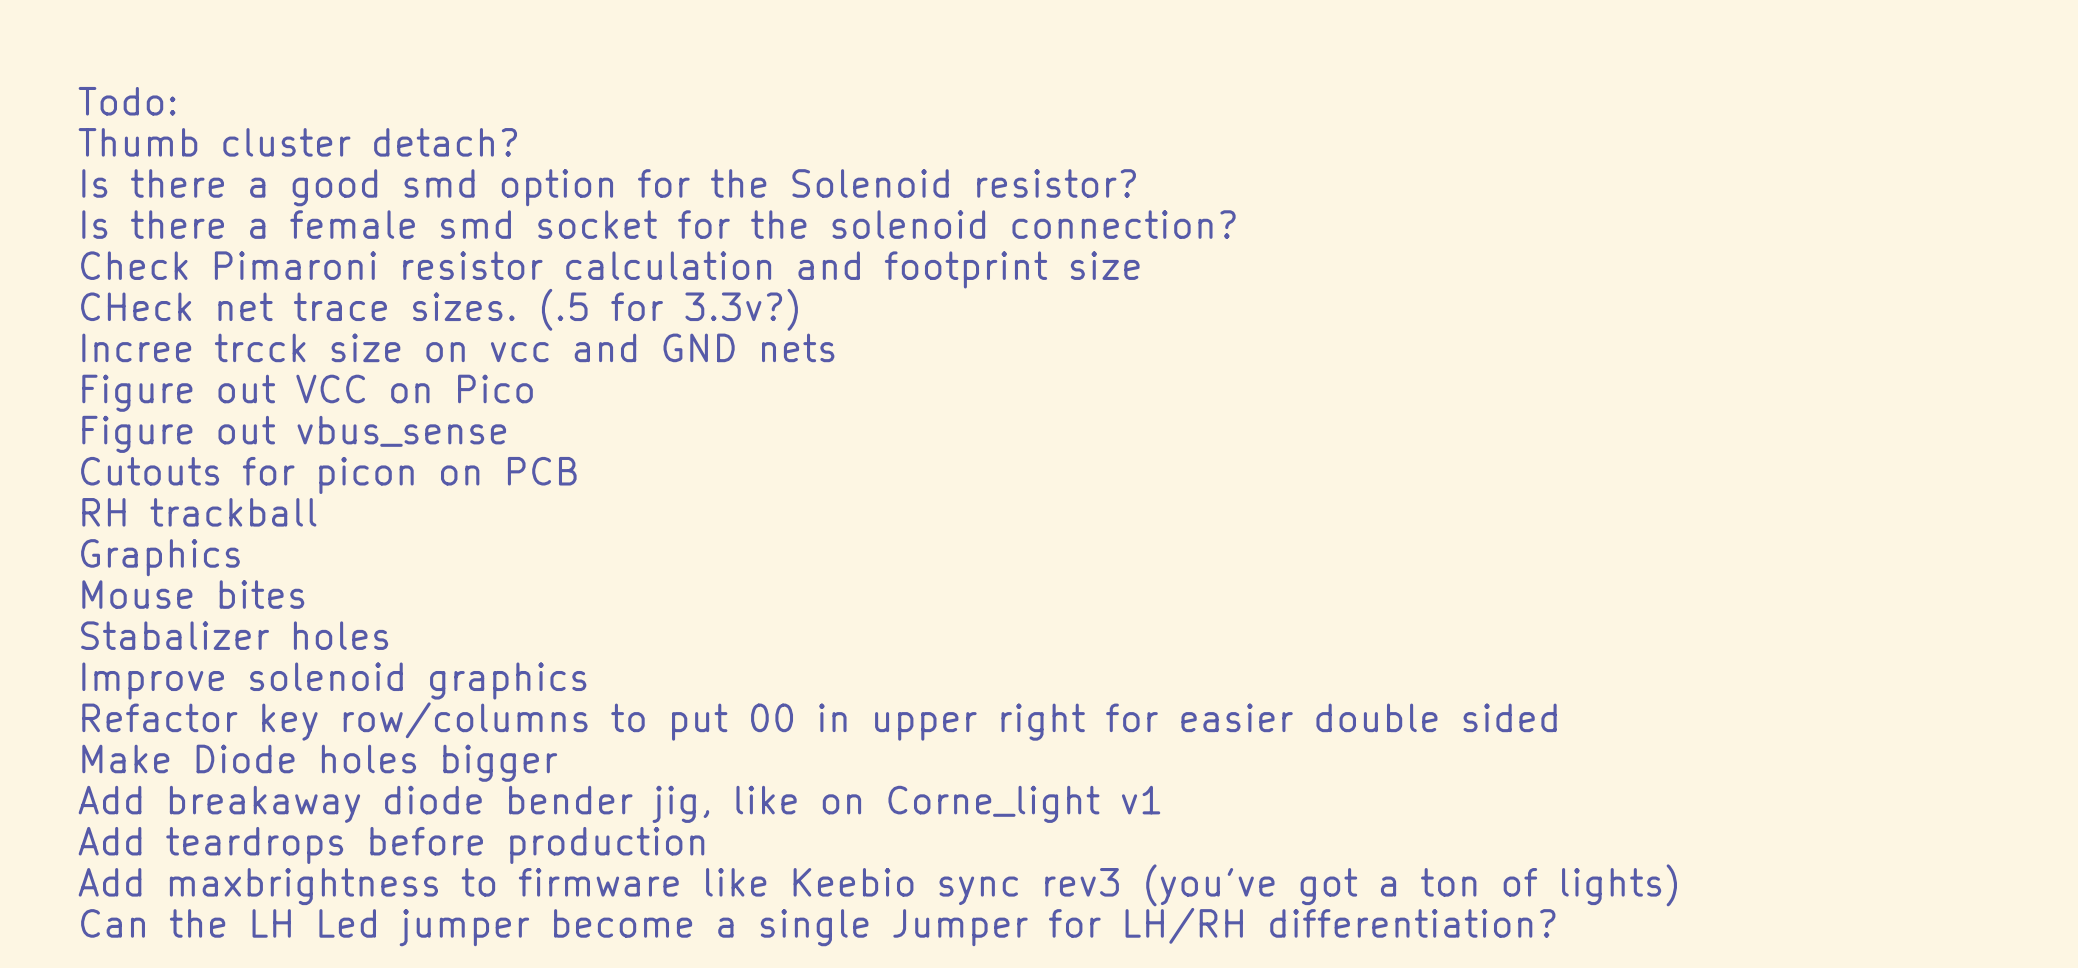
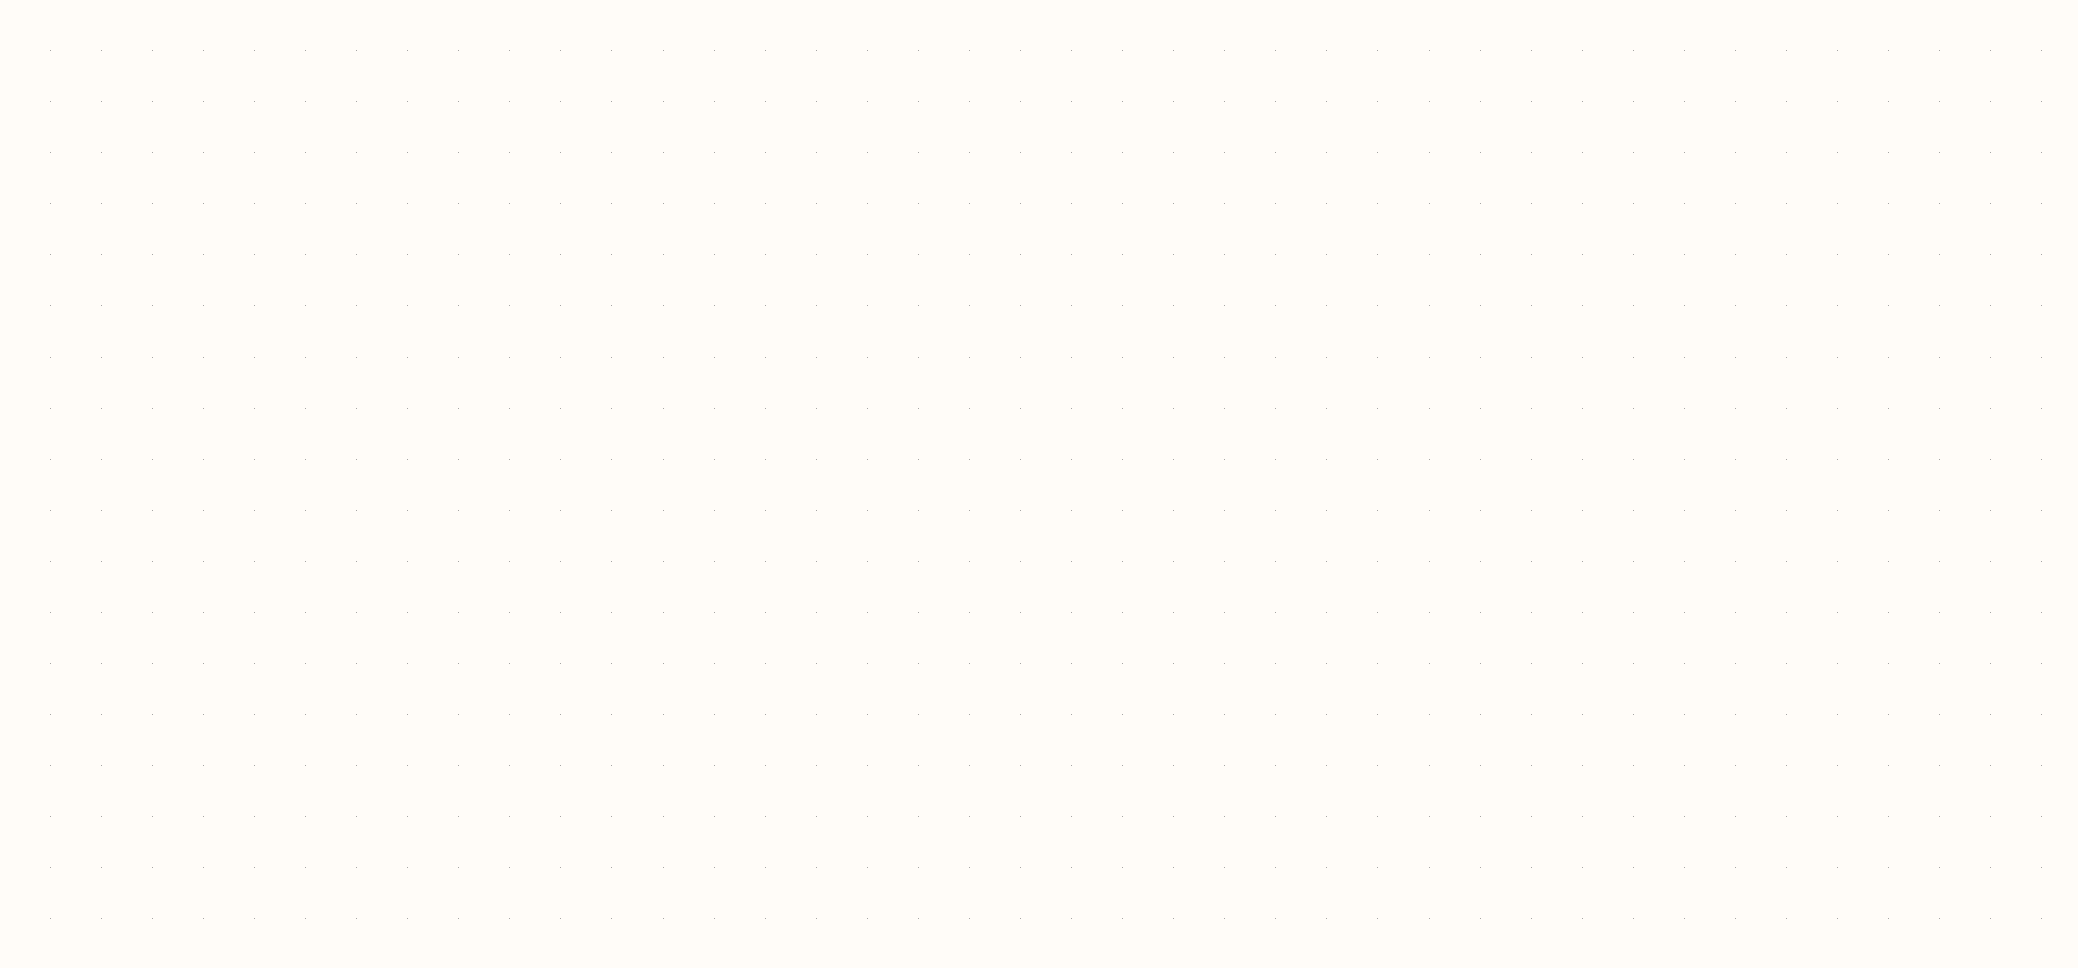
text: Todo: (127, 101) -> none
text: Thumb cluster detach? (297, 142) -> none
text: Is there a good smd option for the Solenoid resistor? (609, 187) -> none
text: Is there a female smd socket for the solenoid connection? (658, 224) -> none
text: Check Pimaroni resistor calculation and footprint size (610, 269) -> none
text: CHeck net trace sizes. (.5 for 3.3v?) (439, 309) -> none
text: Incree trcck size on vcc and GND nets (458, 347) -> none
text: Figure out VCC on Pico (307, 393) -> none
text: Figure out vbus_sense (294, 434) -> none
text: Cutouts for picon on PCB (328, 475) -> none
text: RH trackball (199, 512) -> none
text: Graphics (160, 557) -> none
text: Mouse bites (193, 594) -> none
text: Stabalizer holes (234, 635) -> none
text: Improve solenoid graphics (334, 681) -> none
text: Refactor key row/columns to put 00 in upper right for easier double sided (819, 721) -> none
text: Make Diode holes bigger (319, 763) -> none
text: Add breakaway diode bender jig, like on Corne_light v1 (619, 804) -> none
text: Add teardrops before production (391, 845) -> none
text: Add maxbrightness to firmware like Keebio sync rev3 (you've got a ton of lights) (877, 885) -> none
text: Can the LH Led jumper become a single Jumper for LH/RH differentiation? (818, 927) -> none

